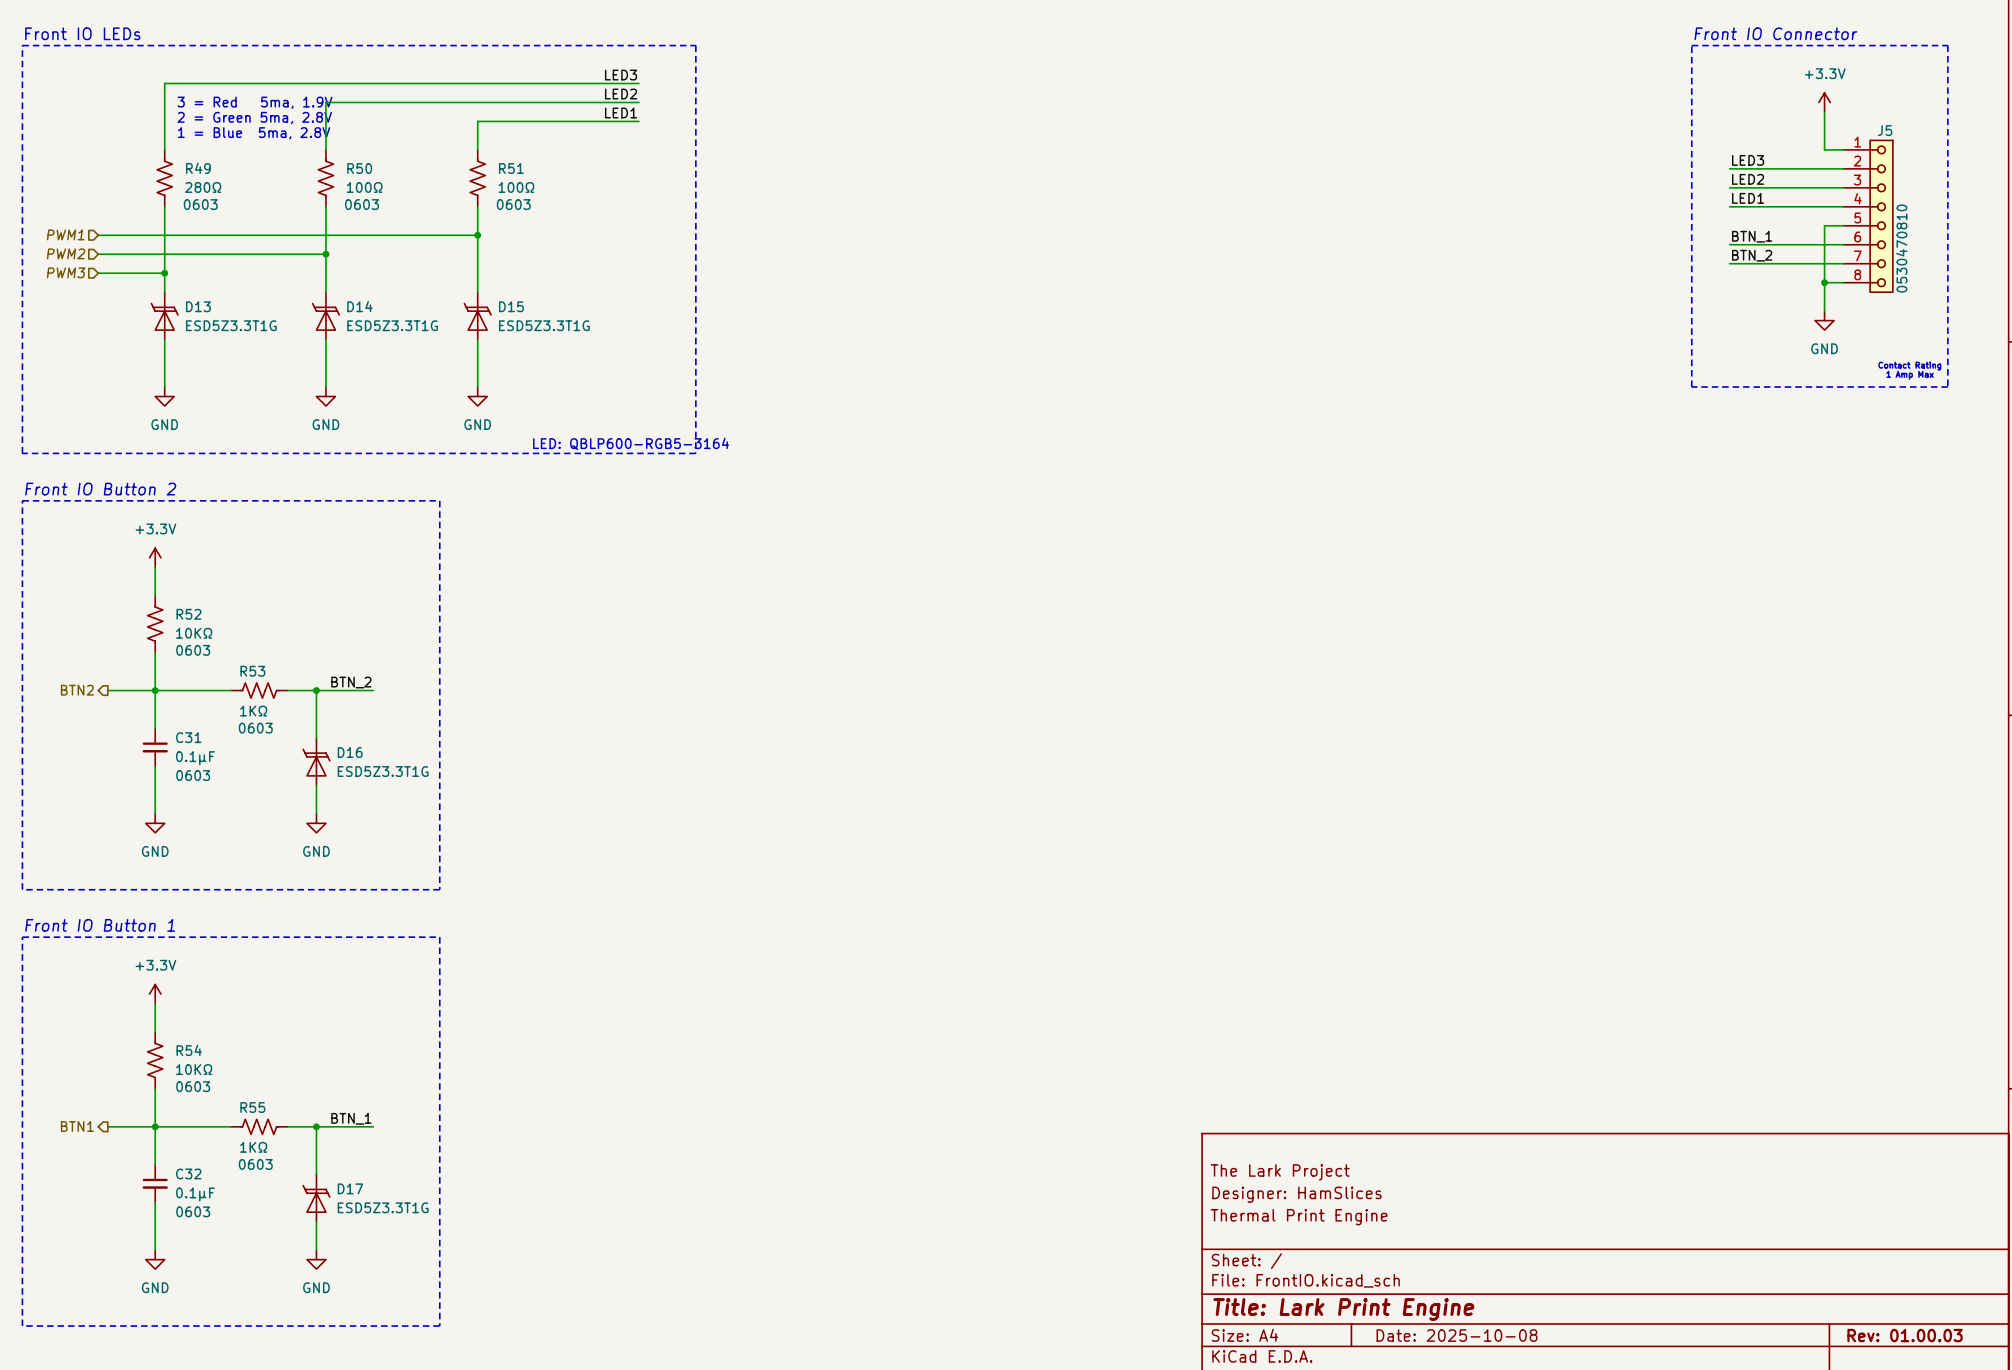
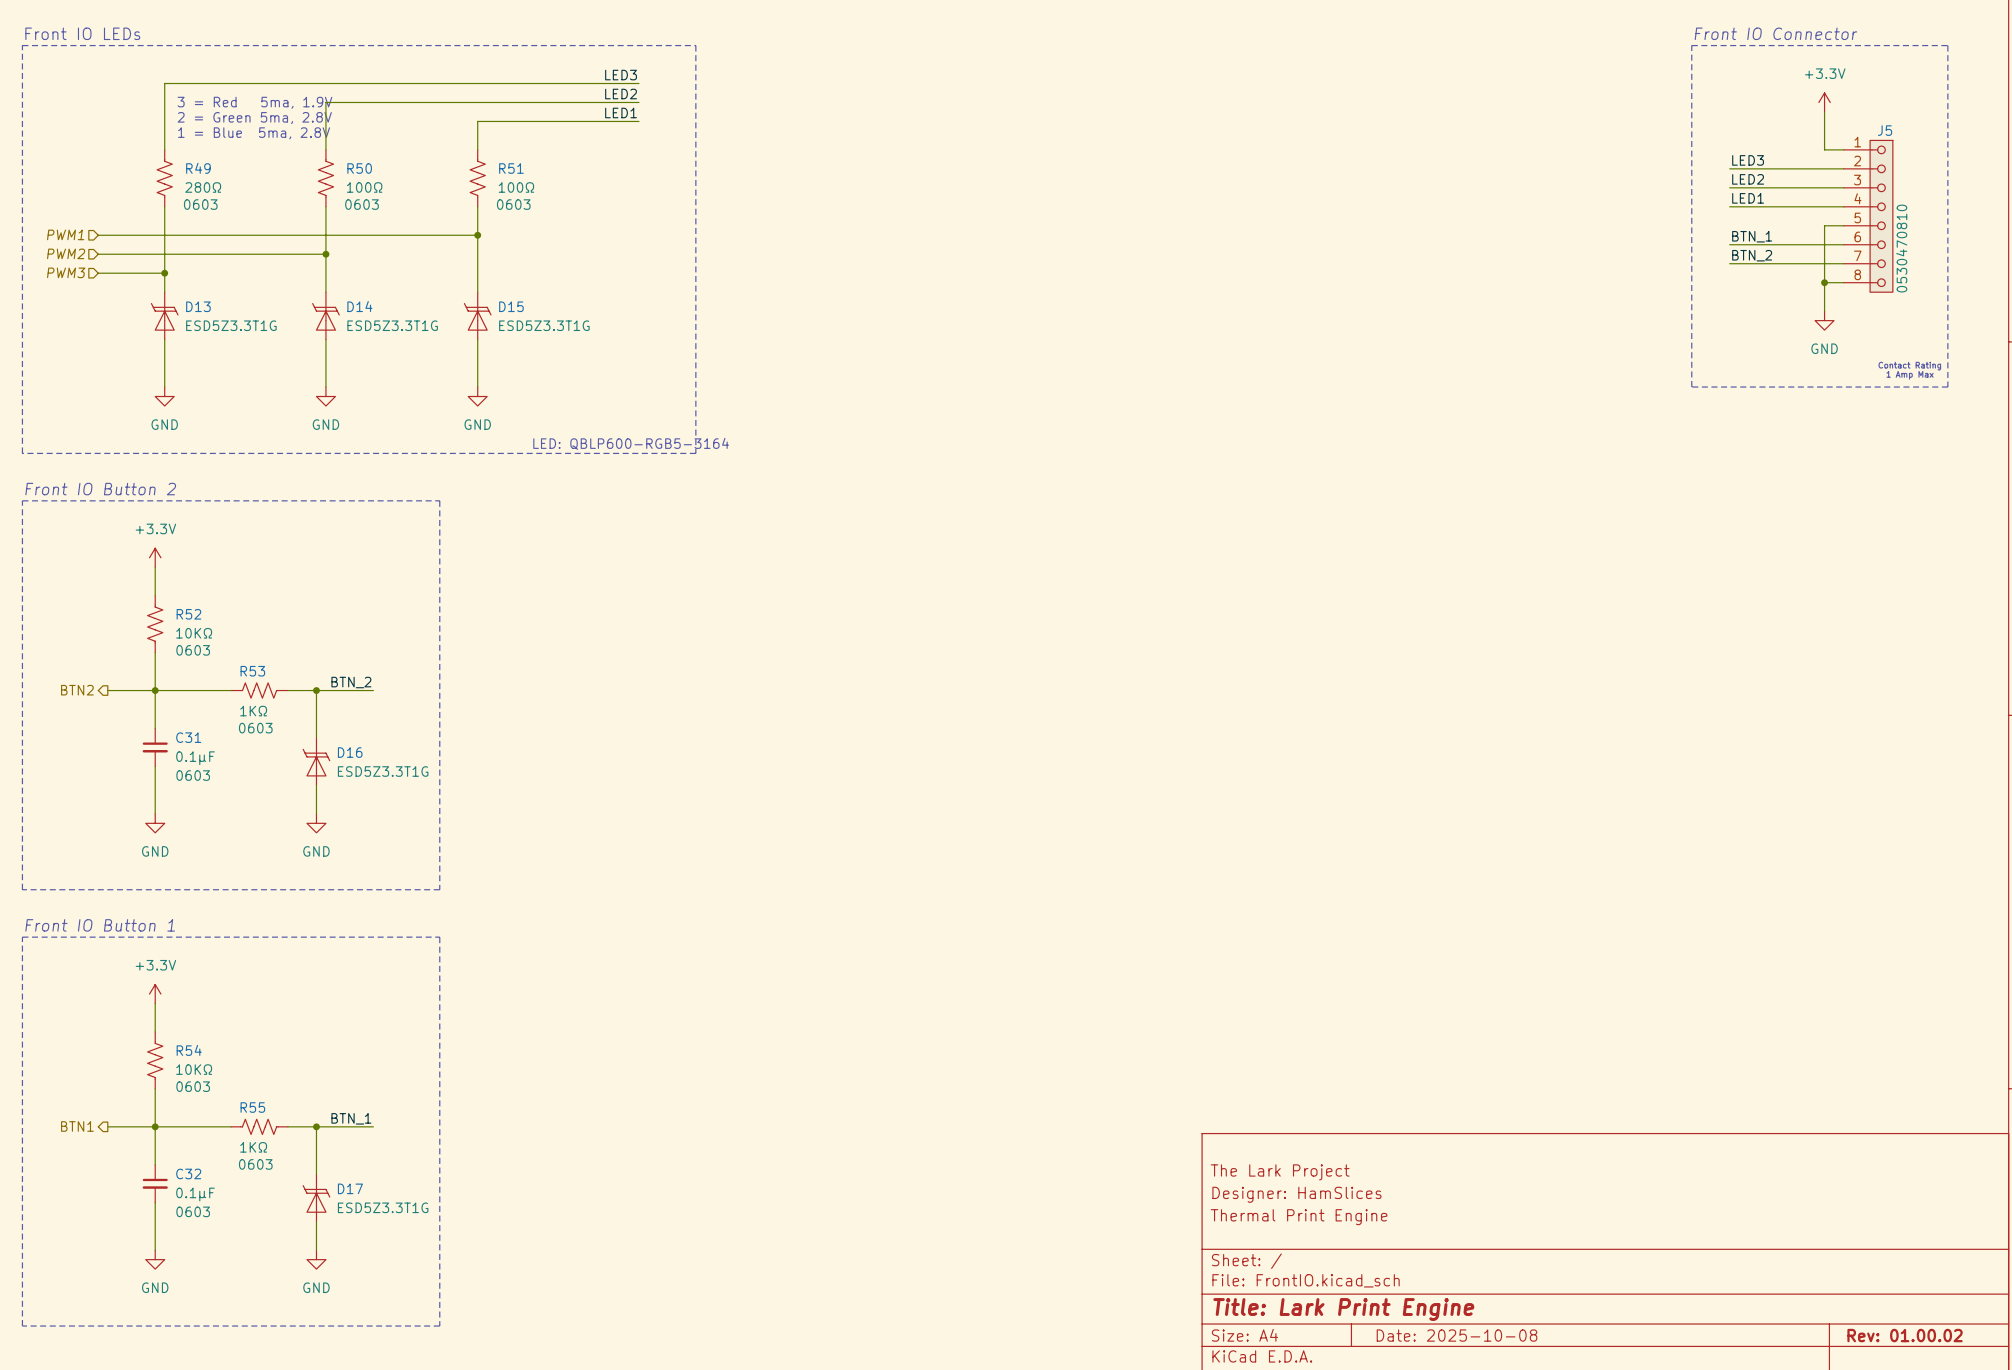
title block: Rev: 01.00.03 (1905, 1335) -> Rev: 01.00.02 (1905, 1335)

